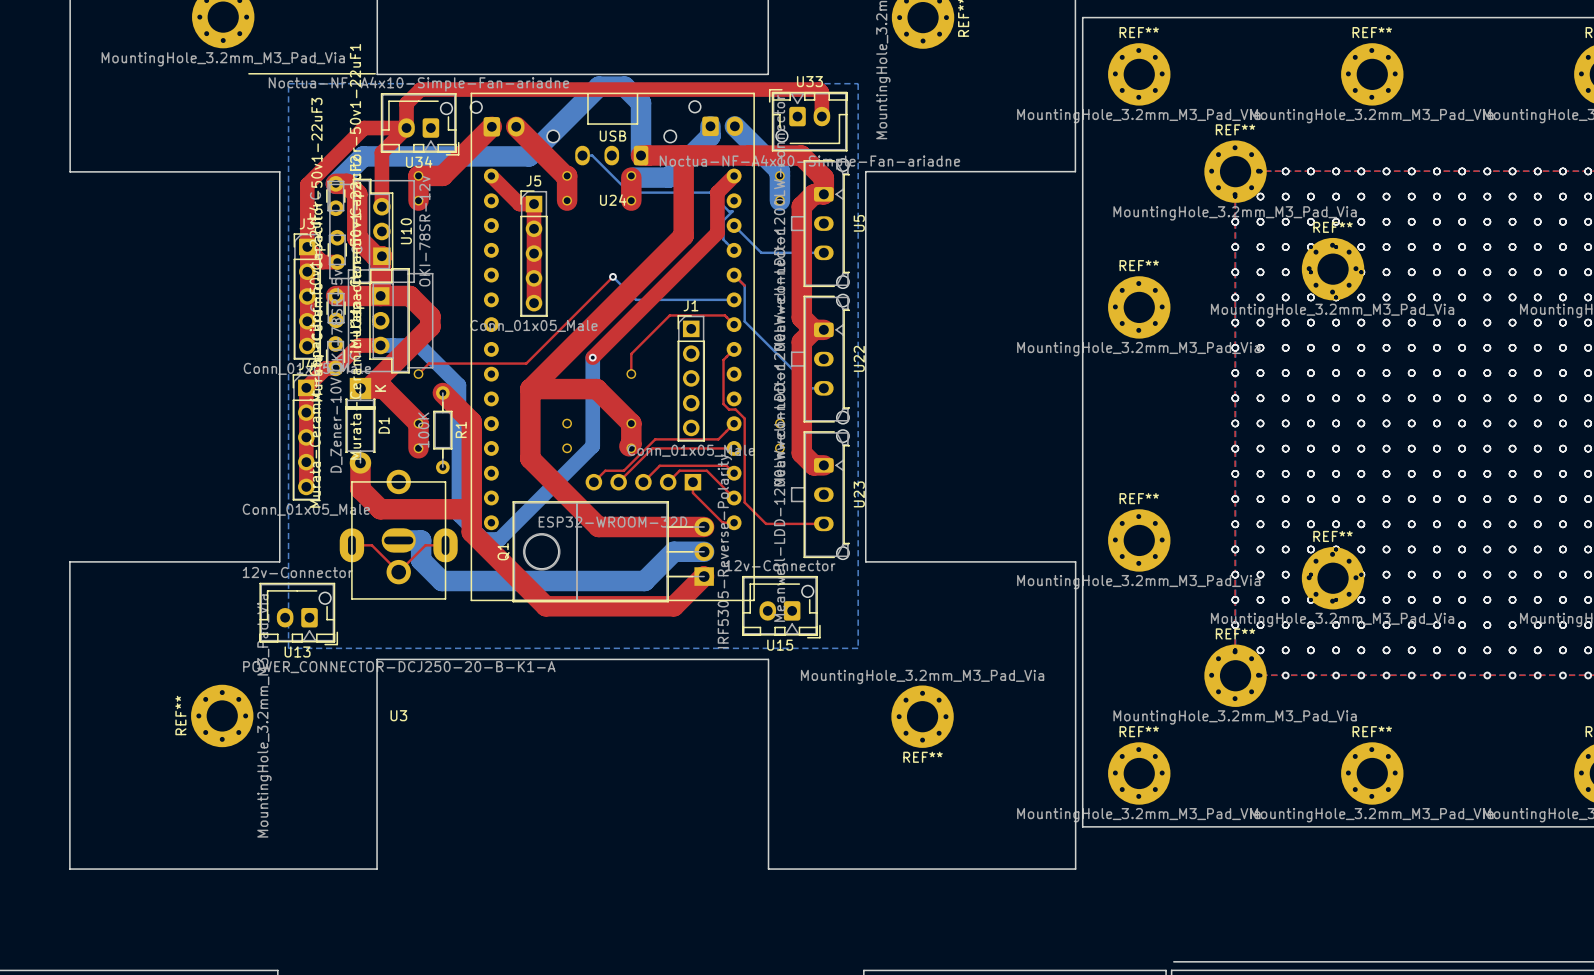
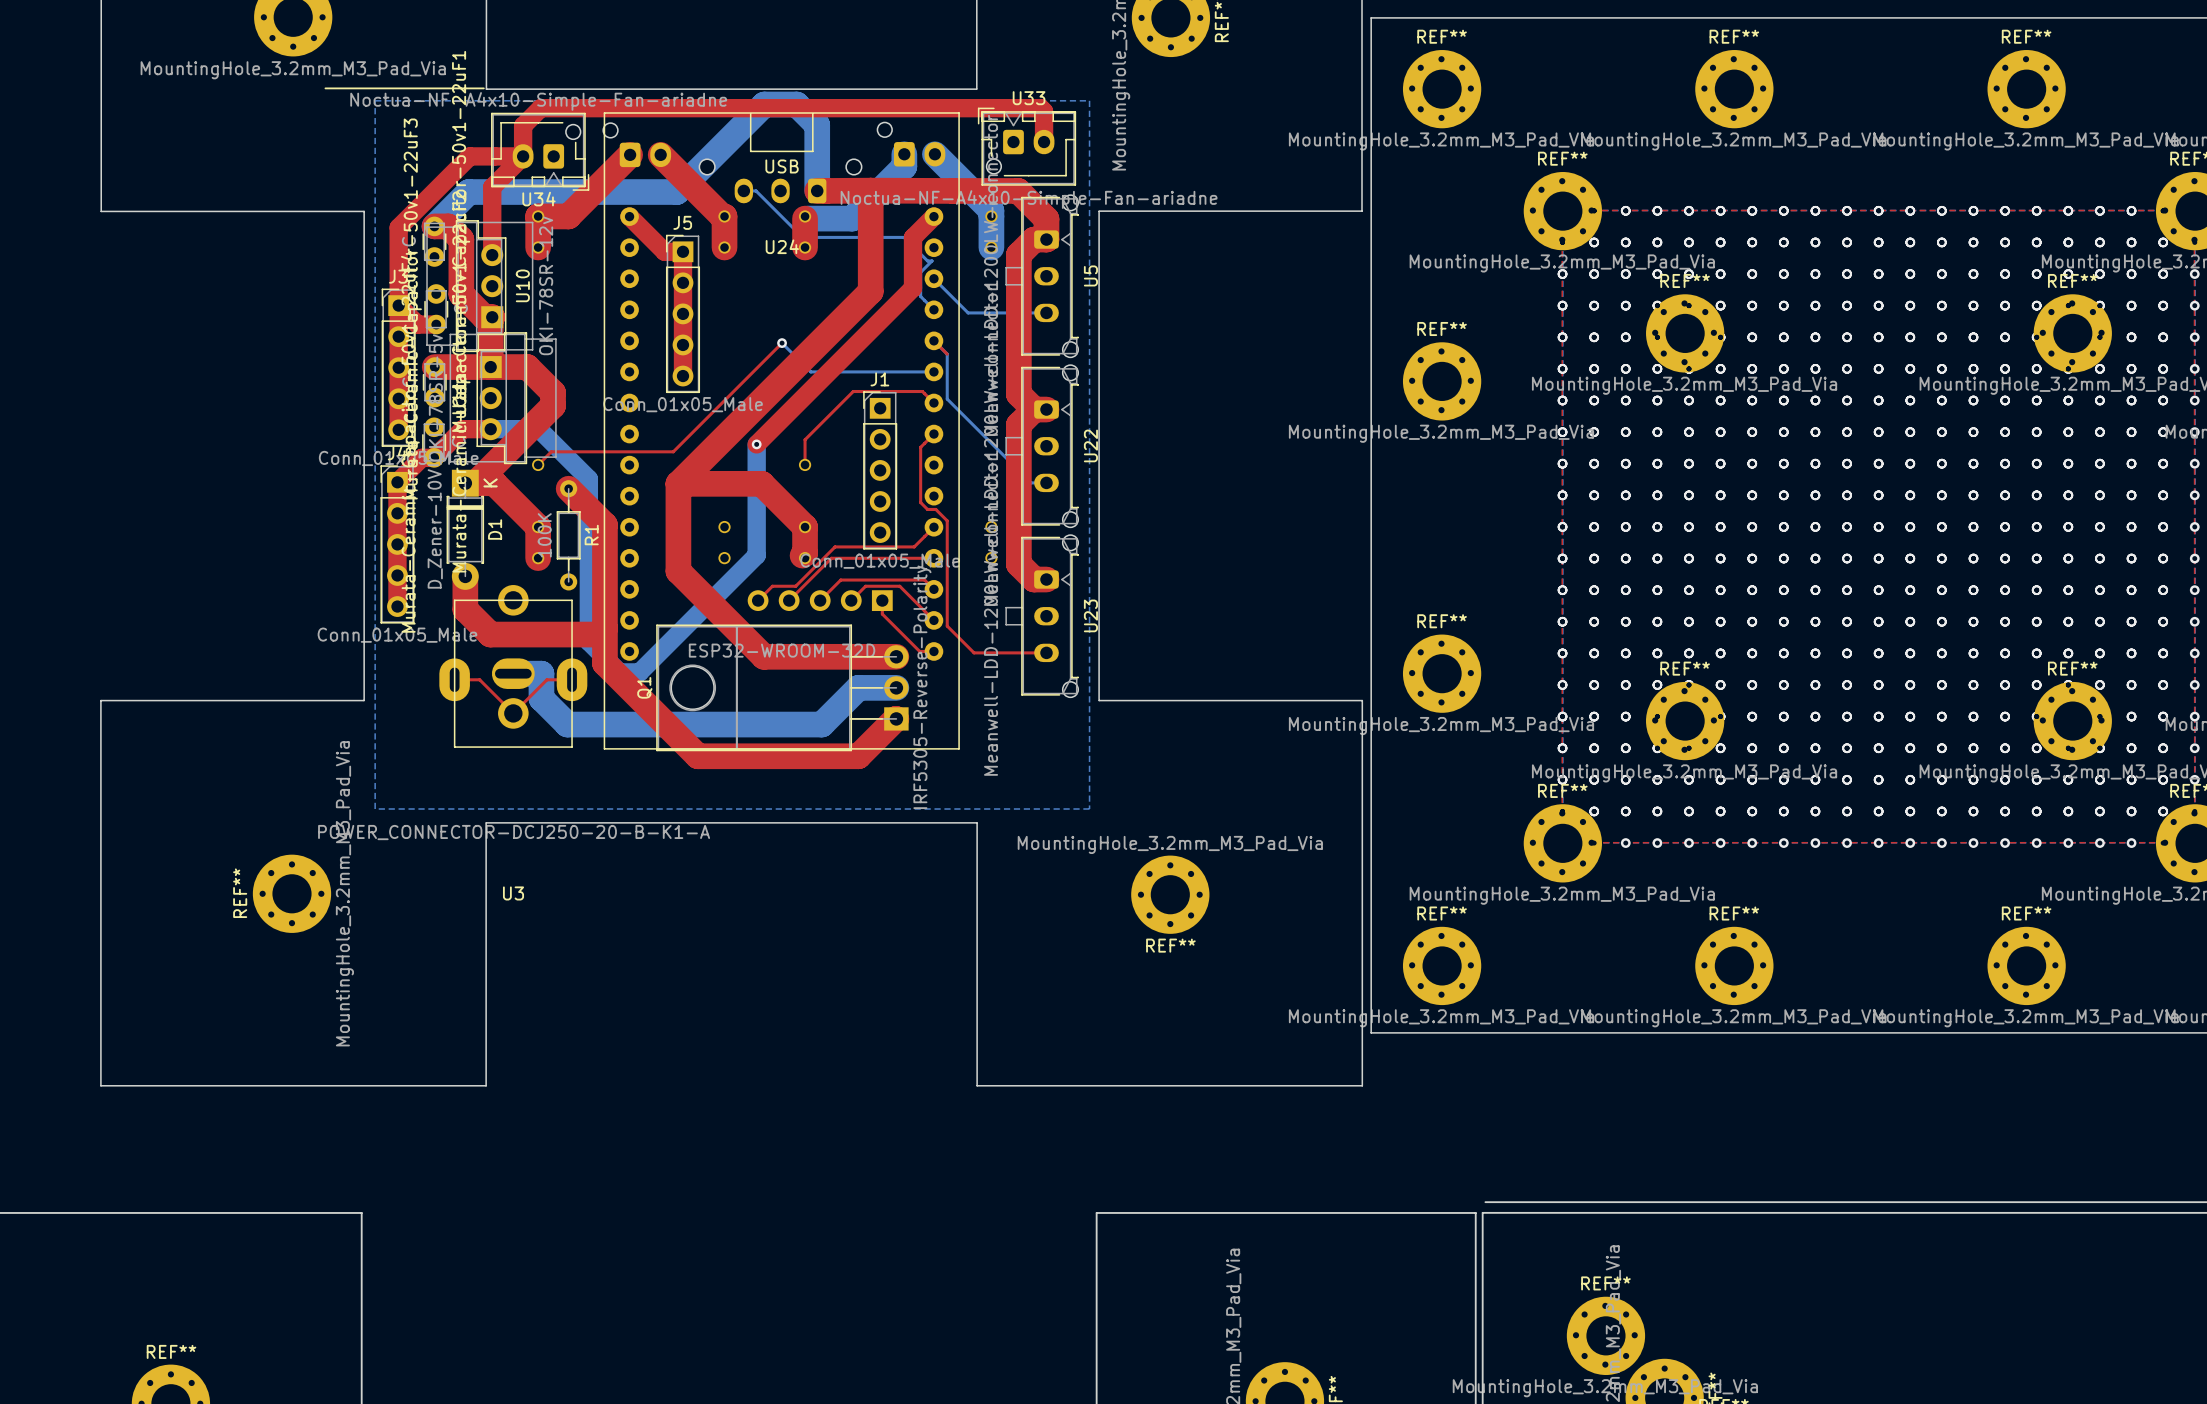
U15: 12v-Connector (781, 607) -> none
U13: 12v-Connector (298, 614) -> none

